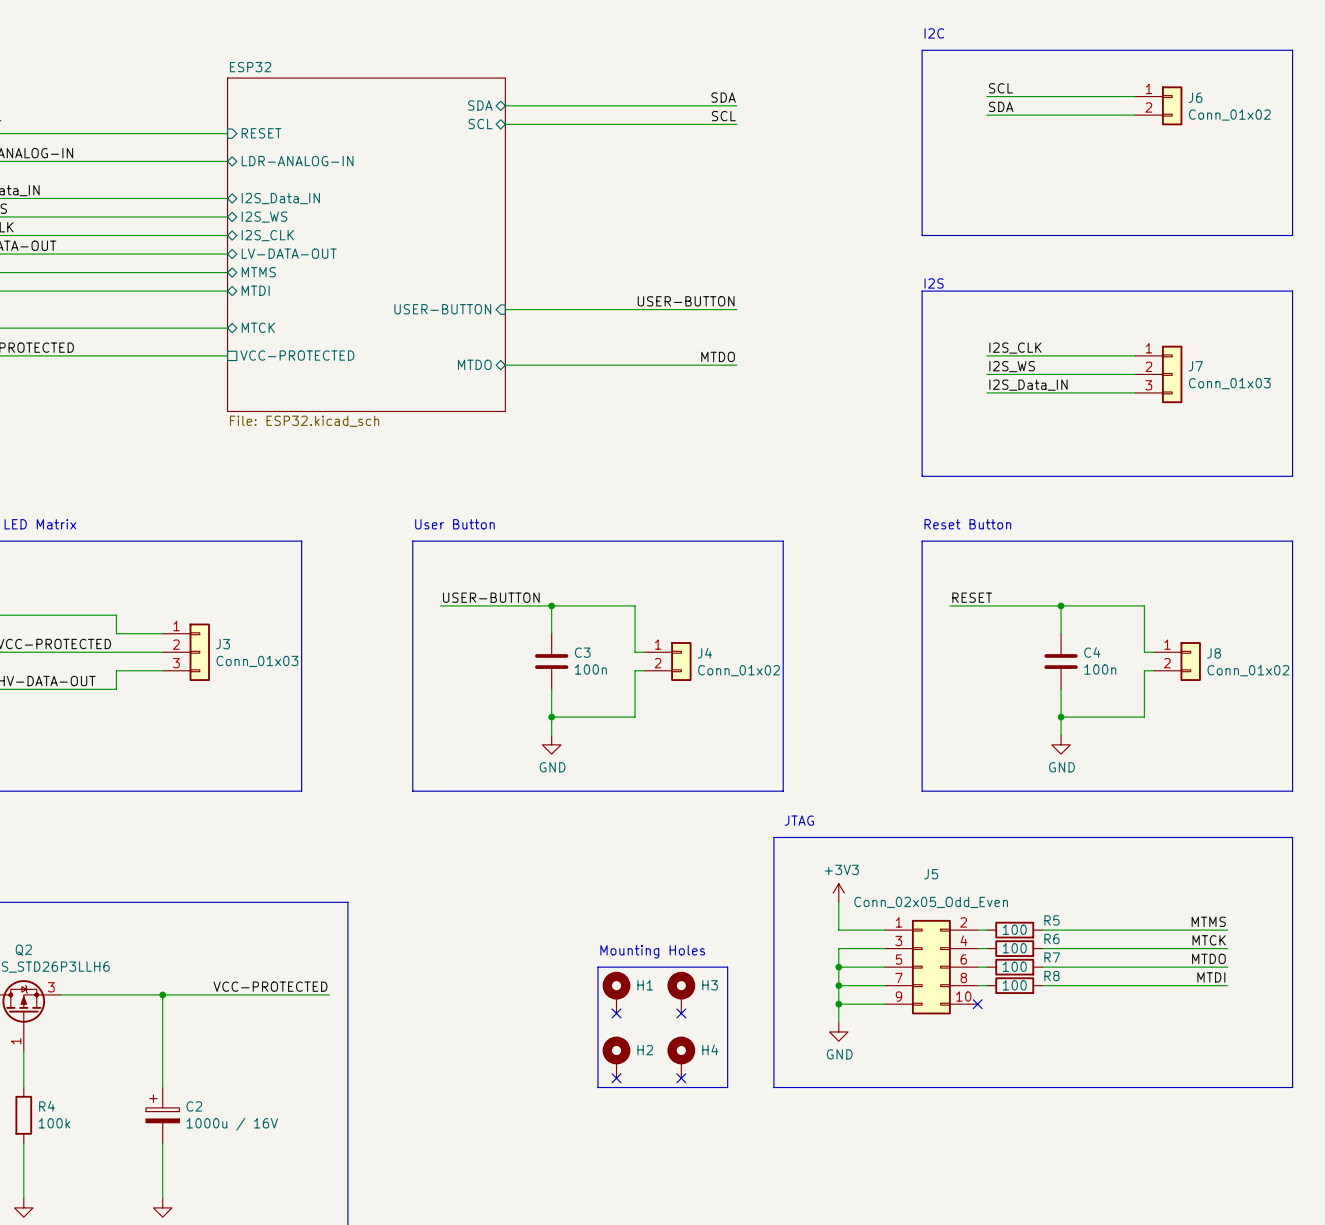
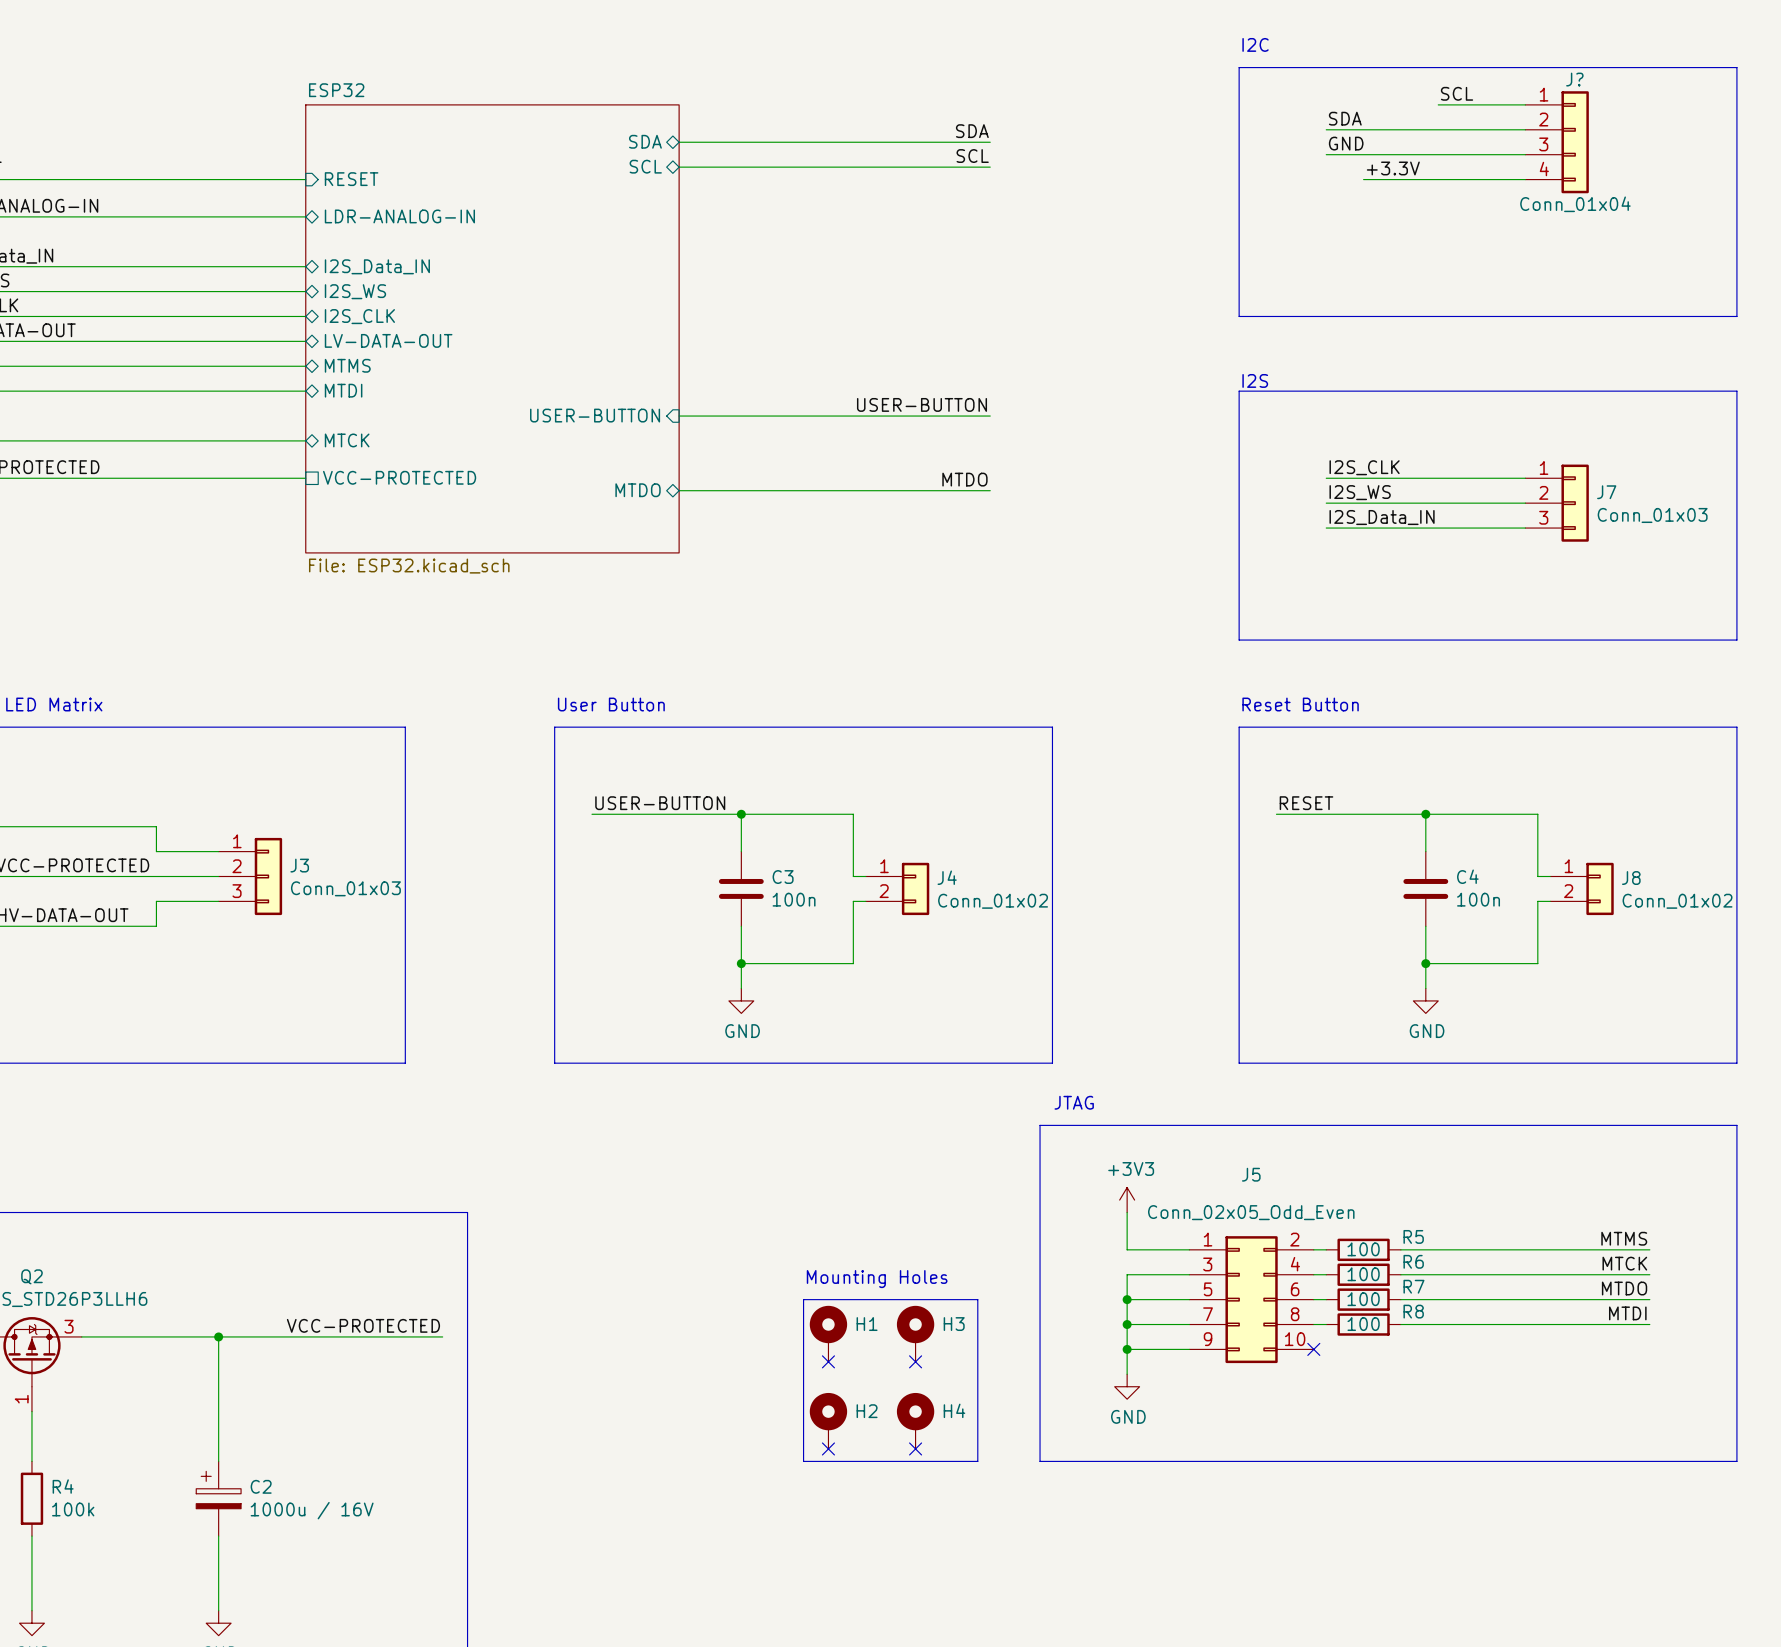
label: none -> SCL (1457, 93)
wire: none -> (1438, 104) (1525, 104)
label: SCL (1000, 88) -> SDA (1345, 118)
J6: Conn_01x02 (1158, 105) -> none
J?: none -> Conn_01x04 (1557, 142)
label: SDA (1001, 106) -> GND (1346, 143)
label: none -> +3.3V (1393, 168)
wire: none -> (1363, 179) (1525, 179)

